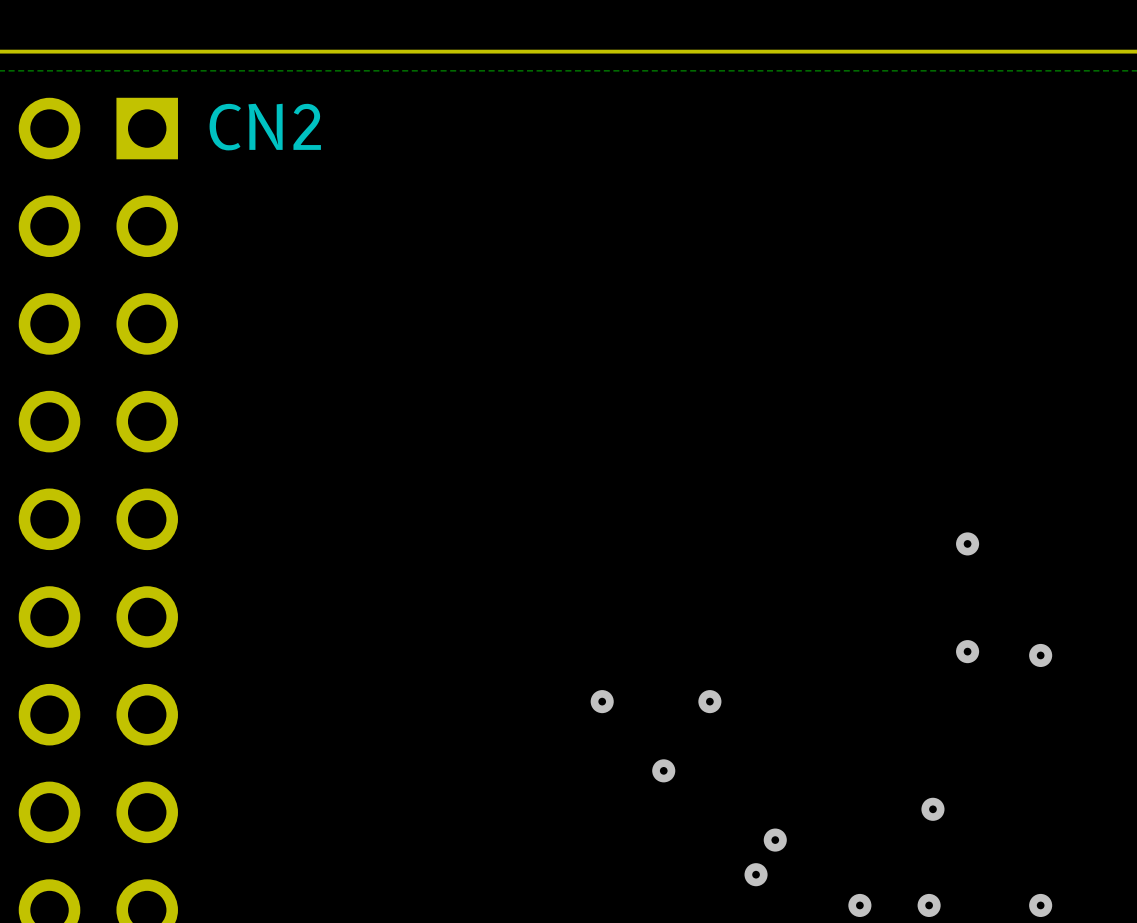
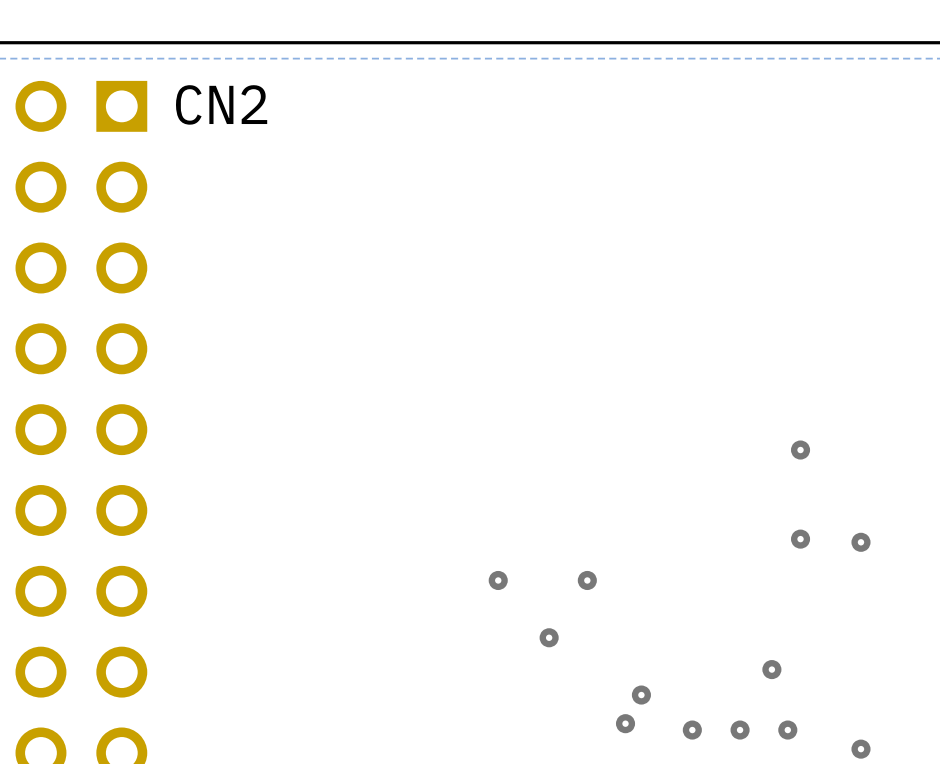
via: none -> (692, 730)
via: none -> (740, 730)
via: none -> (787, 730)
via: (859, 905) -> none
via: (929, 905) -> none

